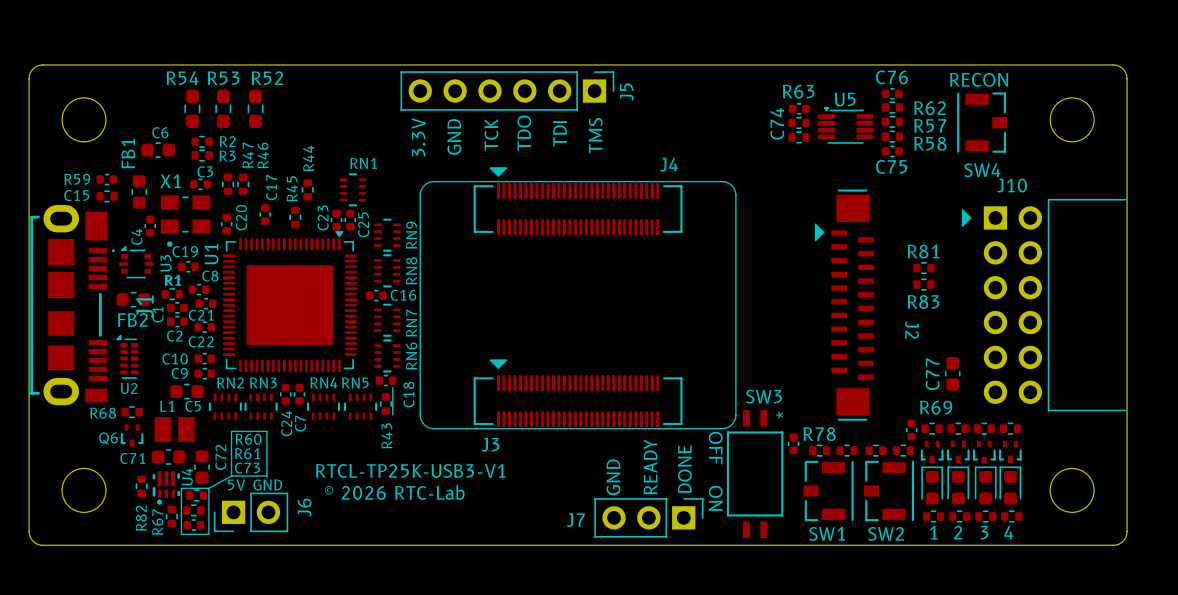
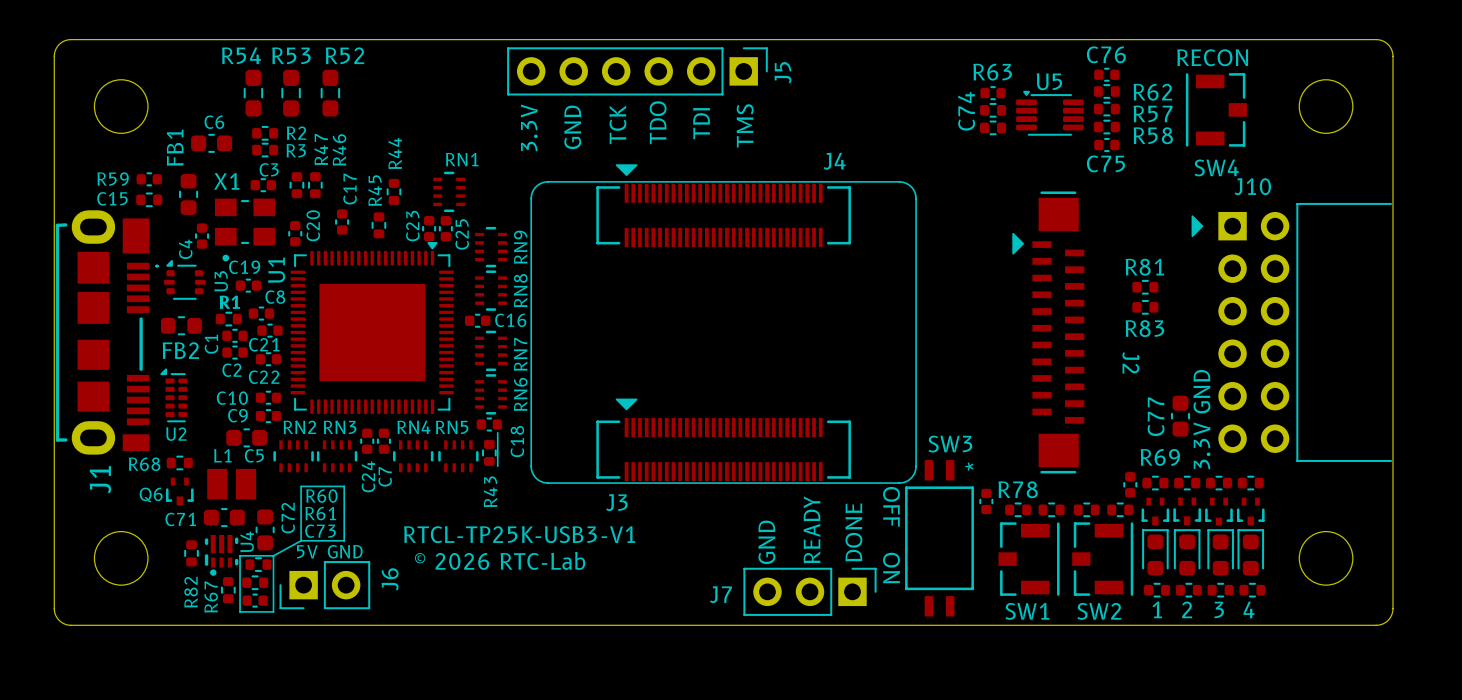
J1 name position: J1 (145, 306) -> J1 (100, 479)
text: none -> GND (1201, 391)
text: none -> 3.3V (1201, 445)

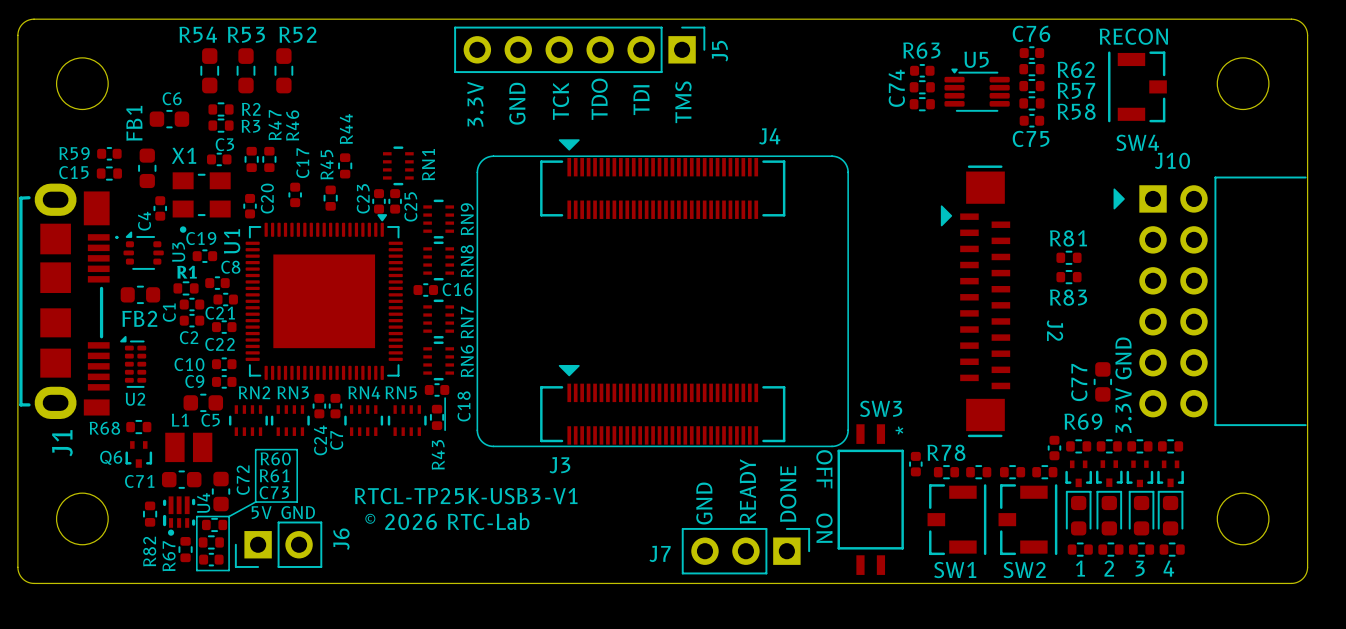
RN1 name rotation: 0° (462, 159) -> 90° counterclockwise (428, 164)

